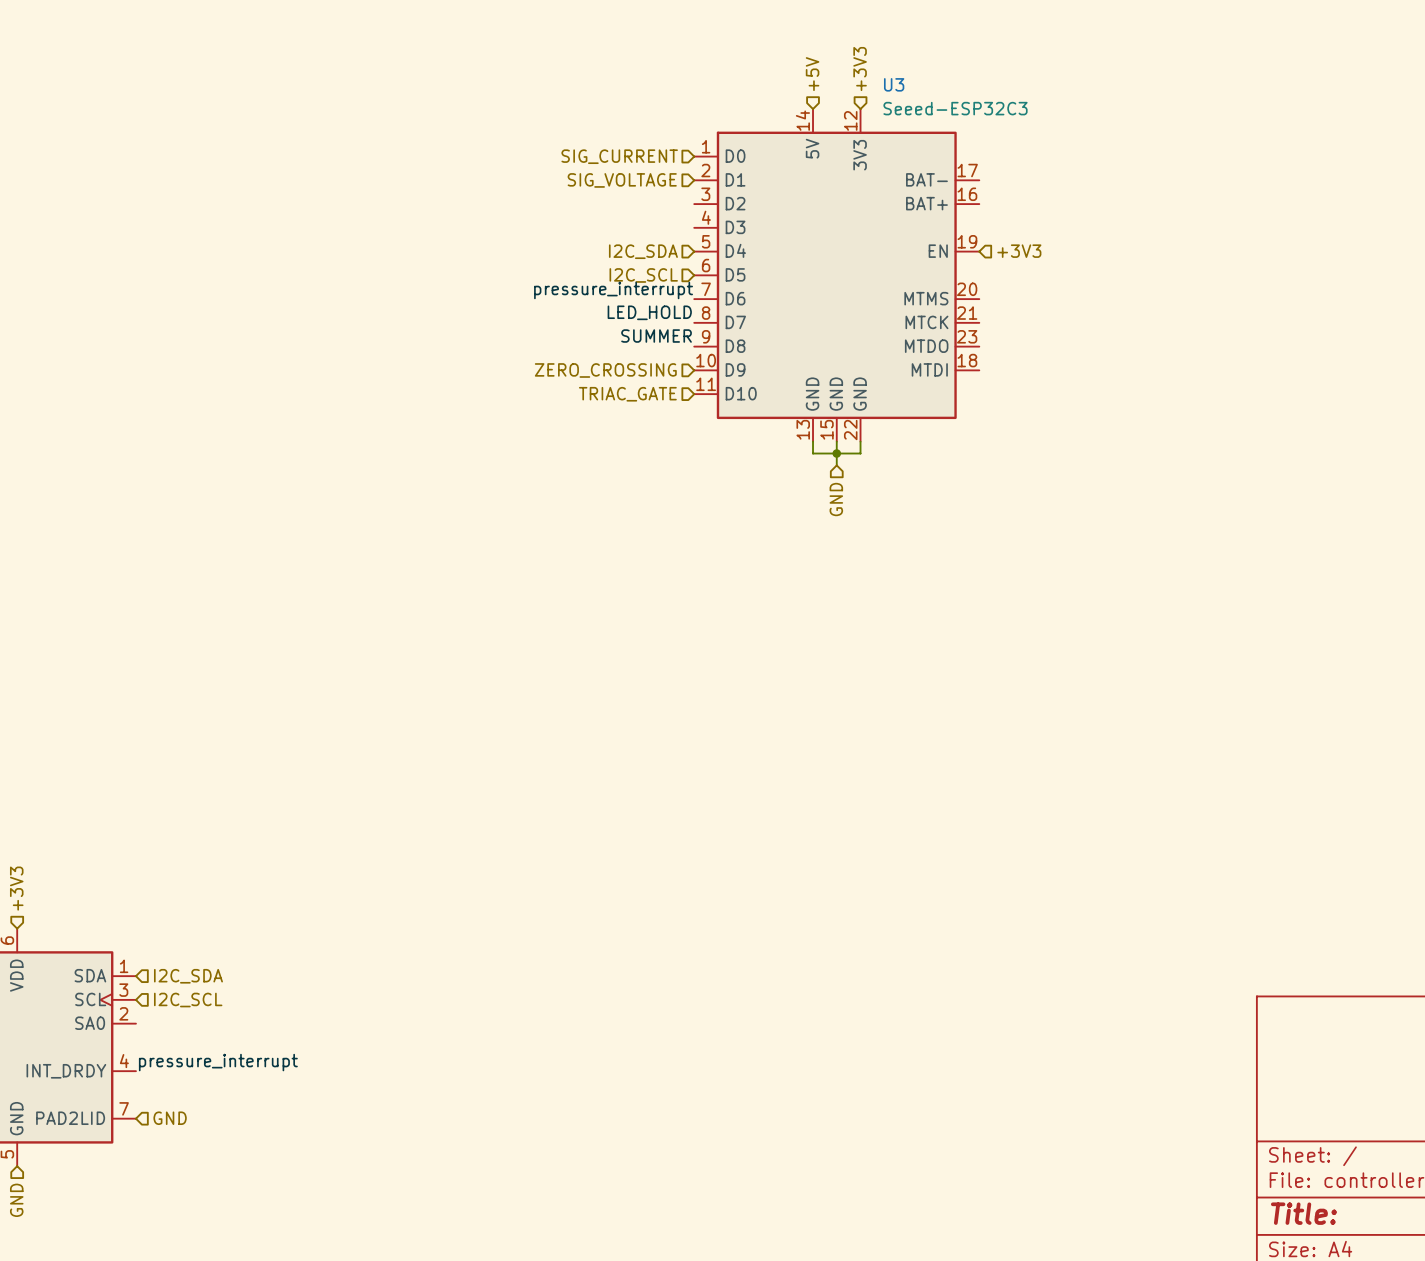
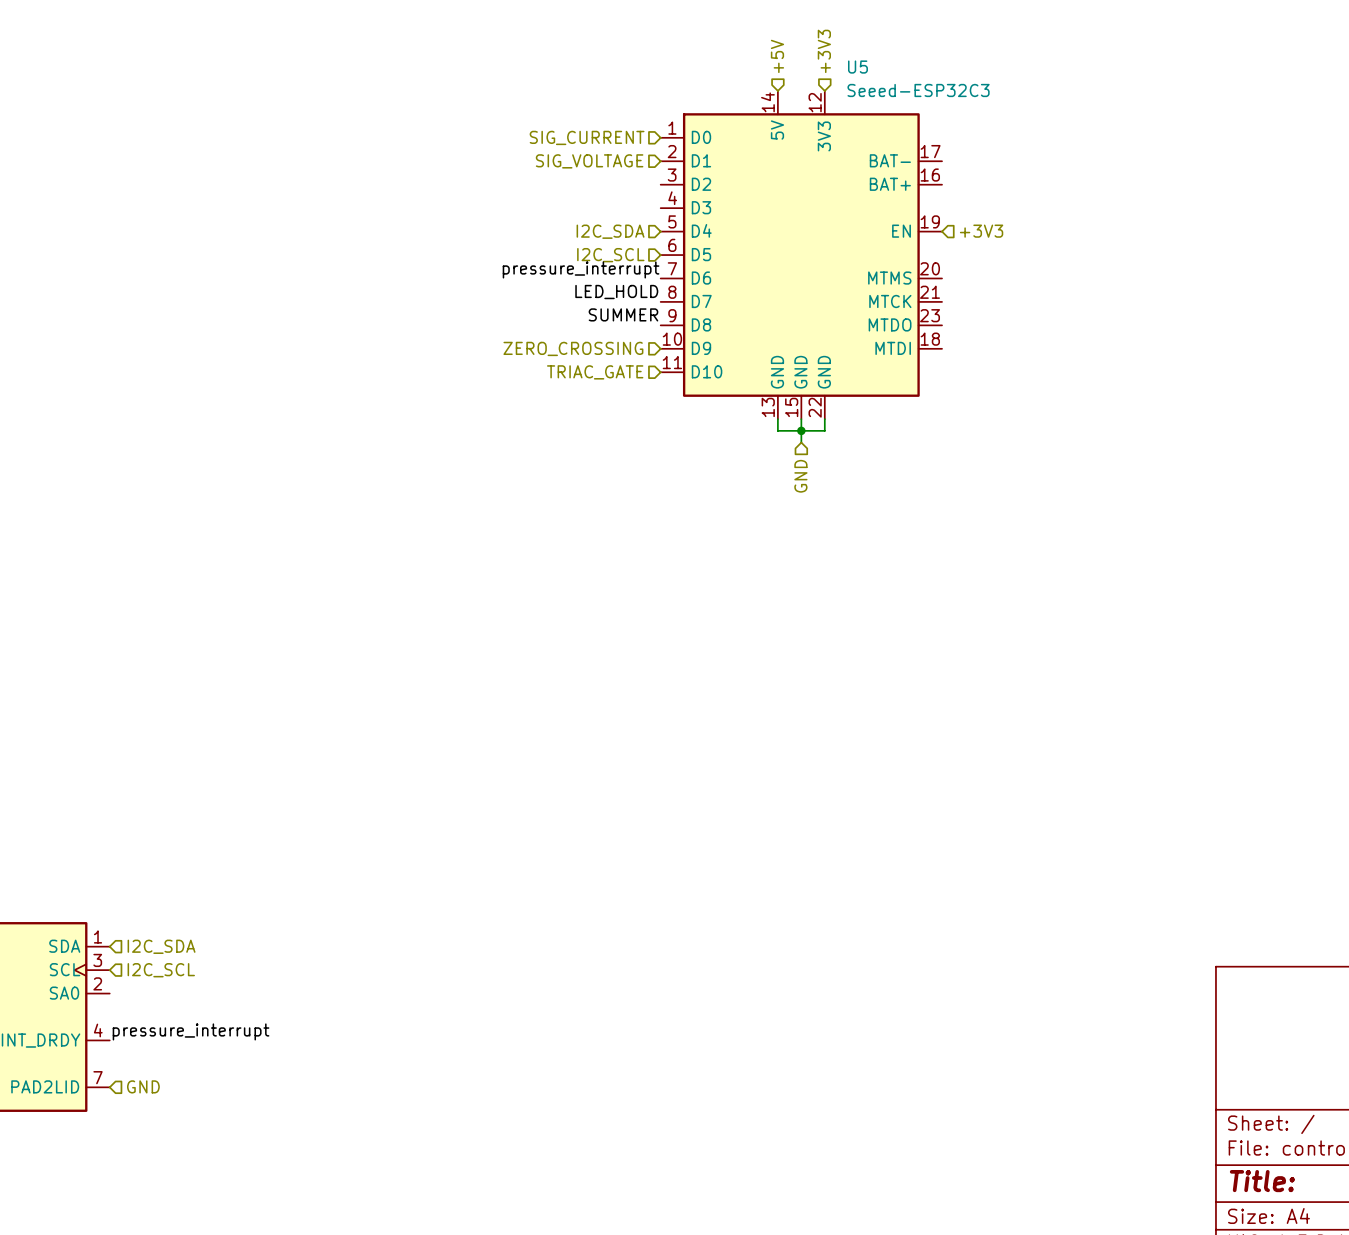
U3 name: U3 (894, 84) -> U5 (857, 67)

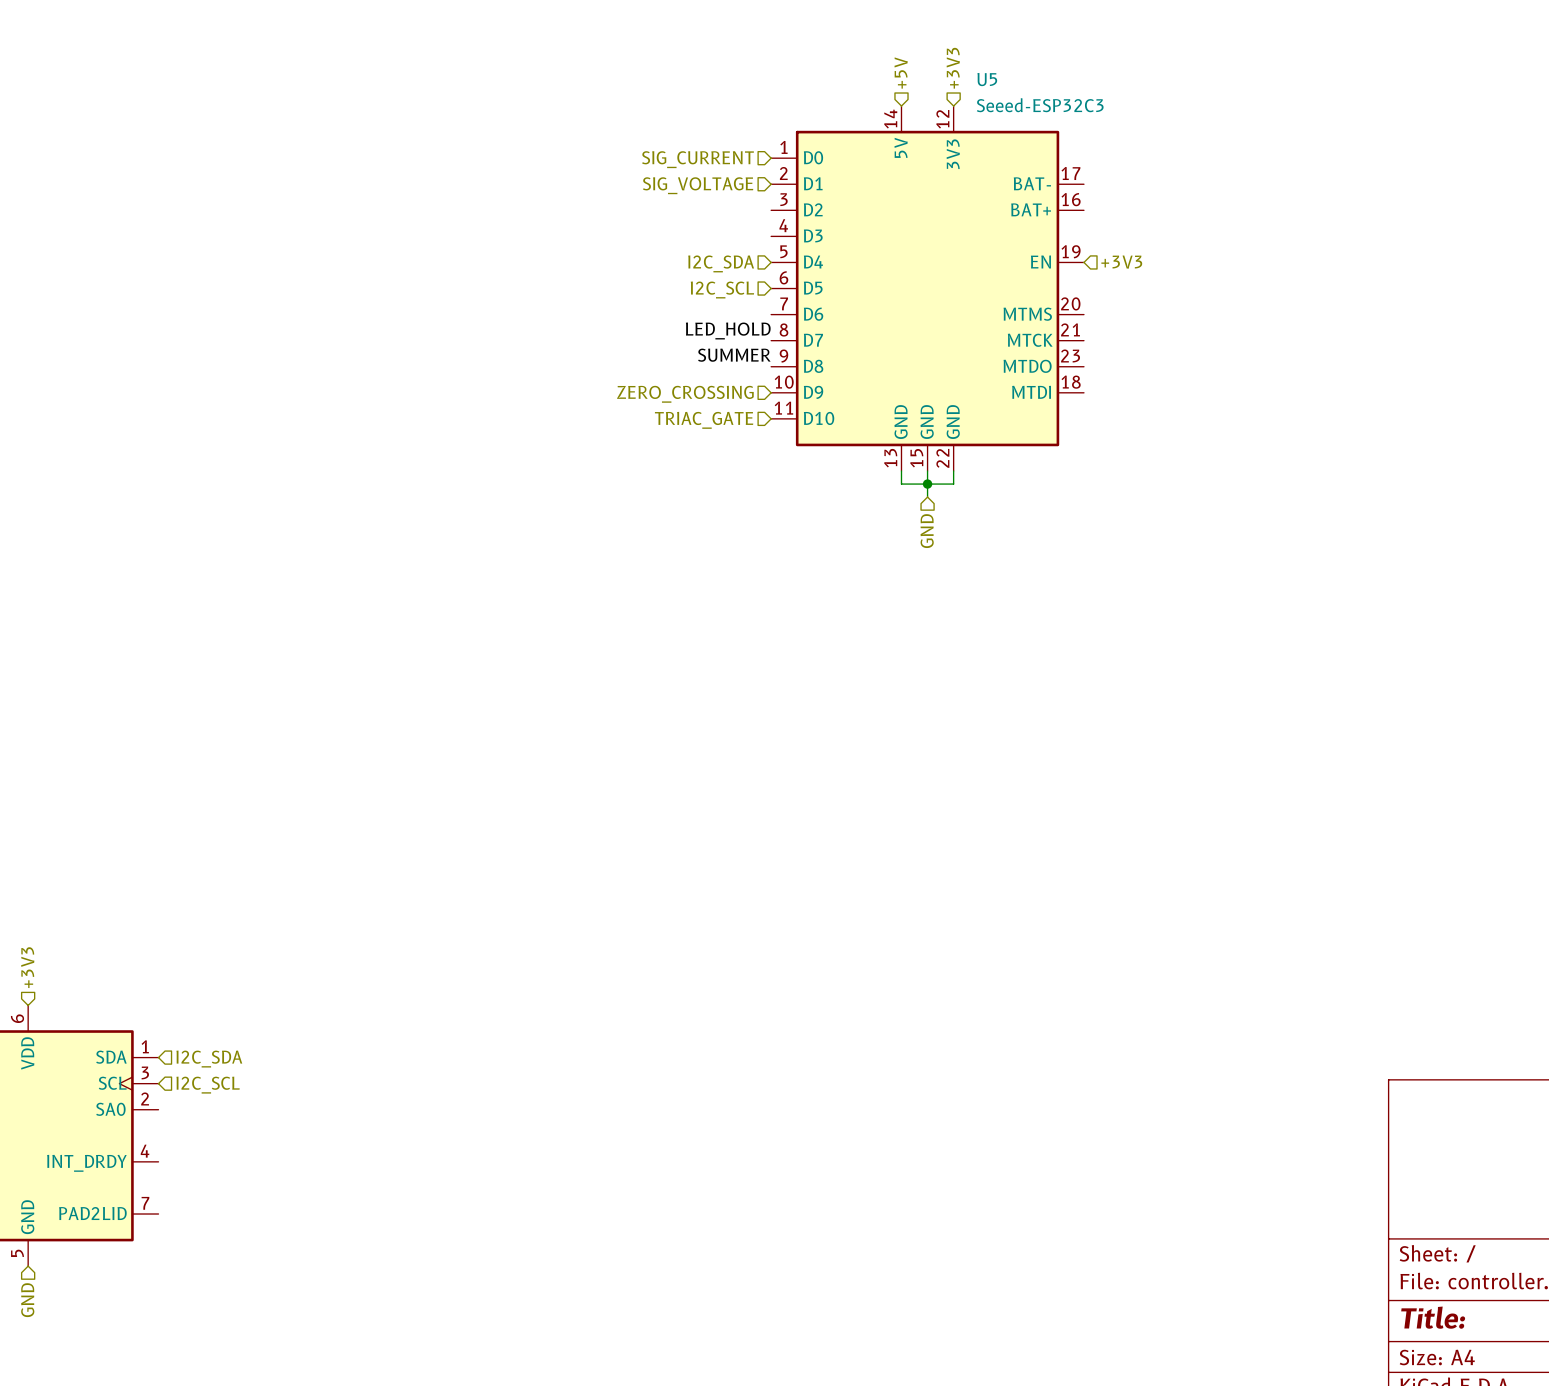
label: pressure_interrupt (581, 269) -> none
label: pressure_interrupt (191, 1031) -> none
hierarchical label: GND (143, 1086) -> none

